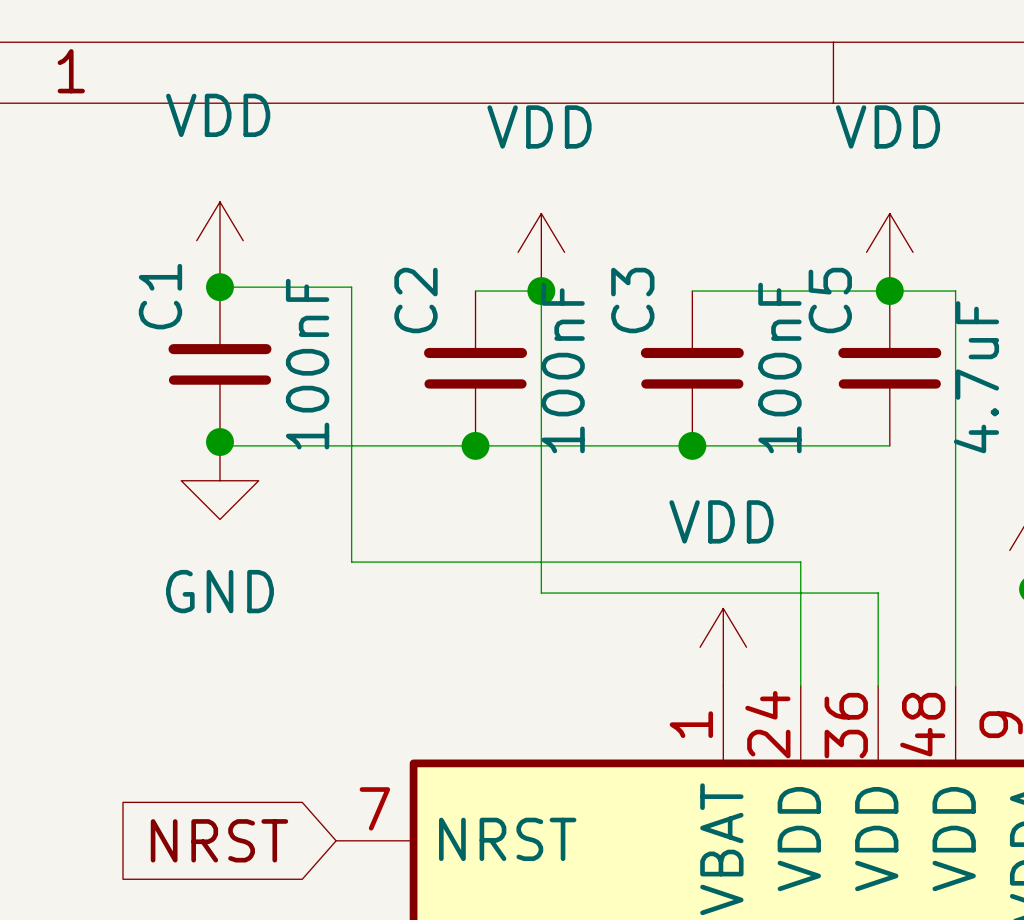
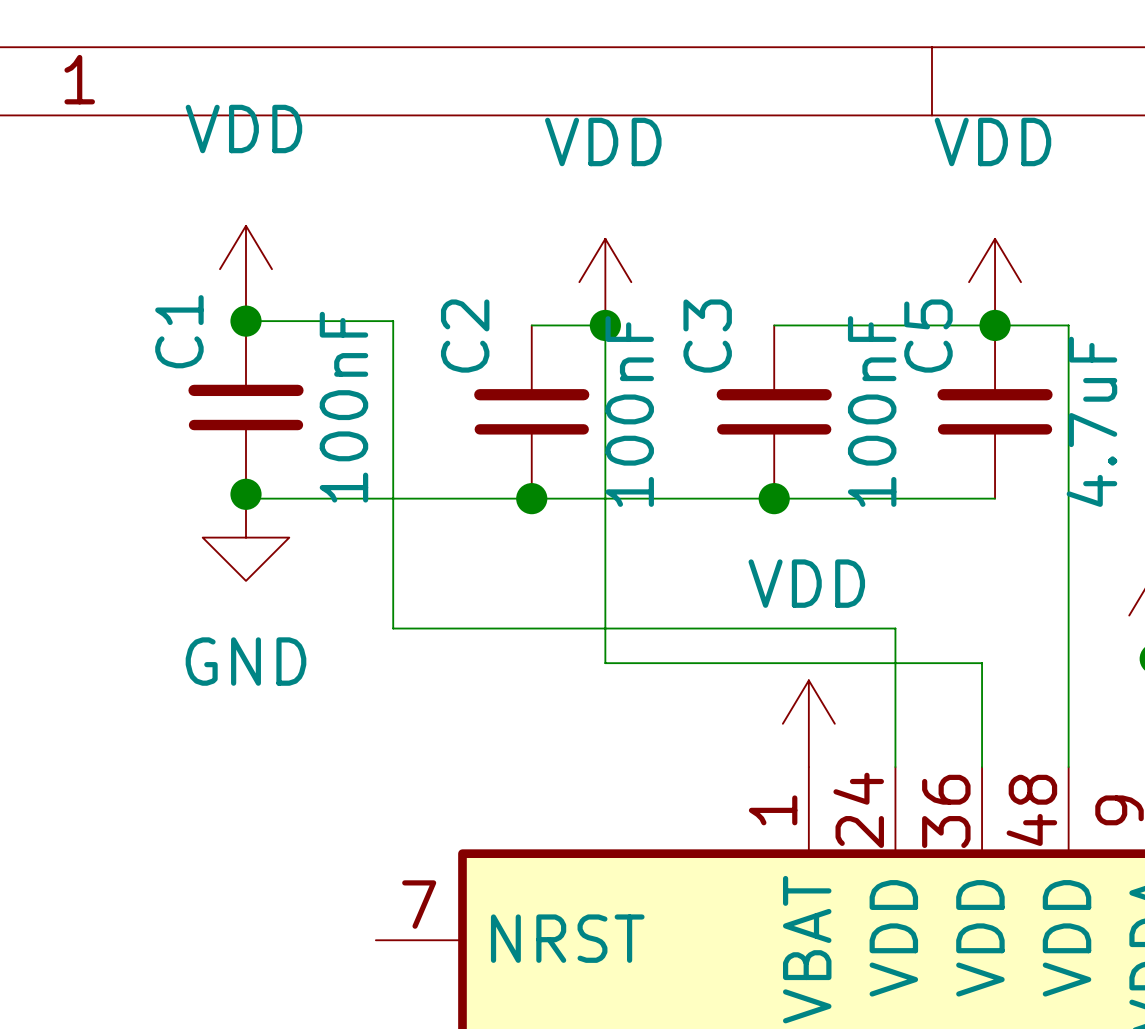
global label: NRST (219, 840) -> none

